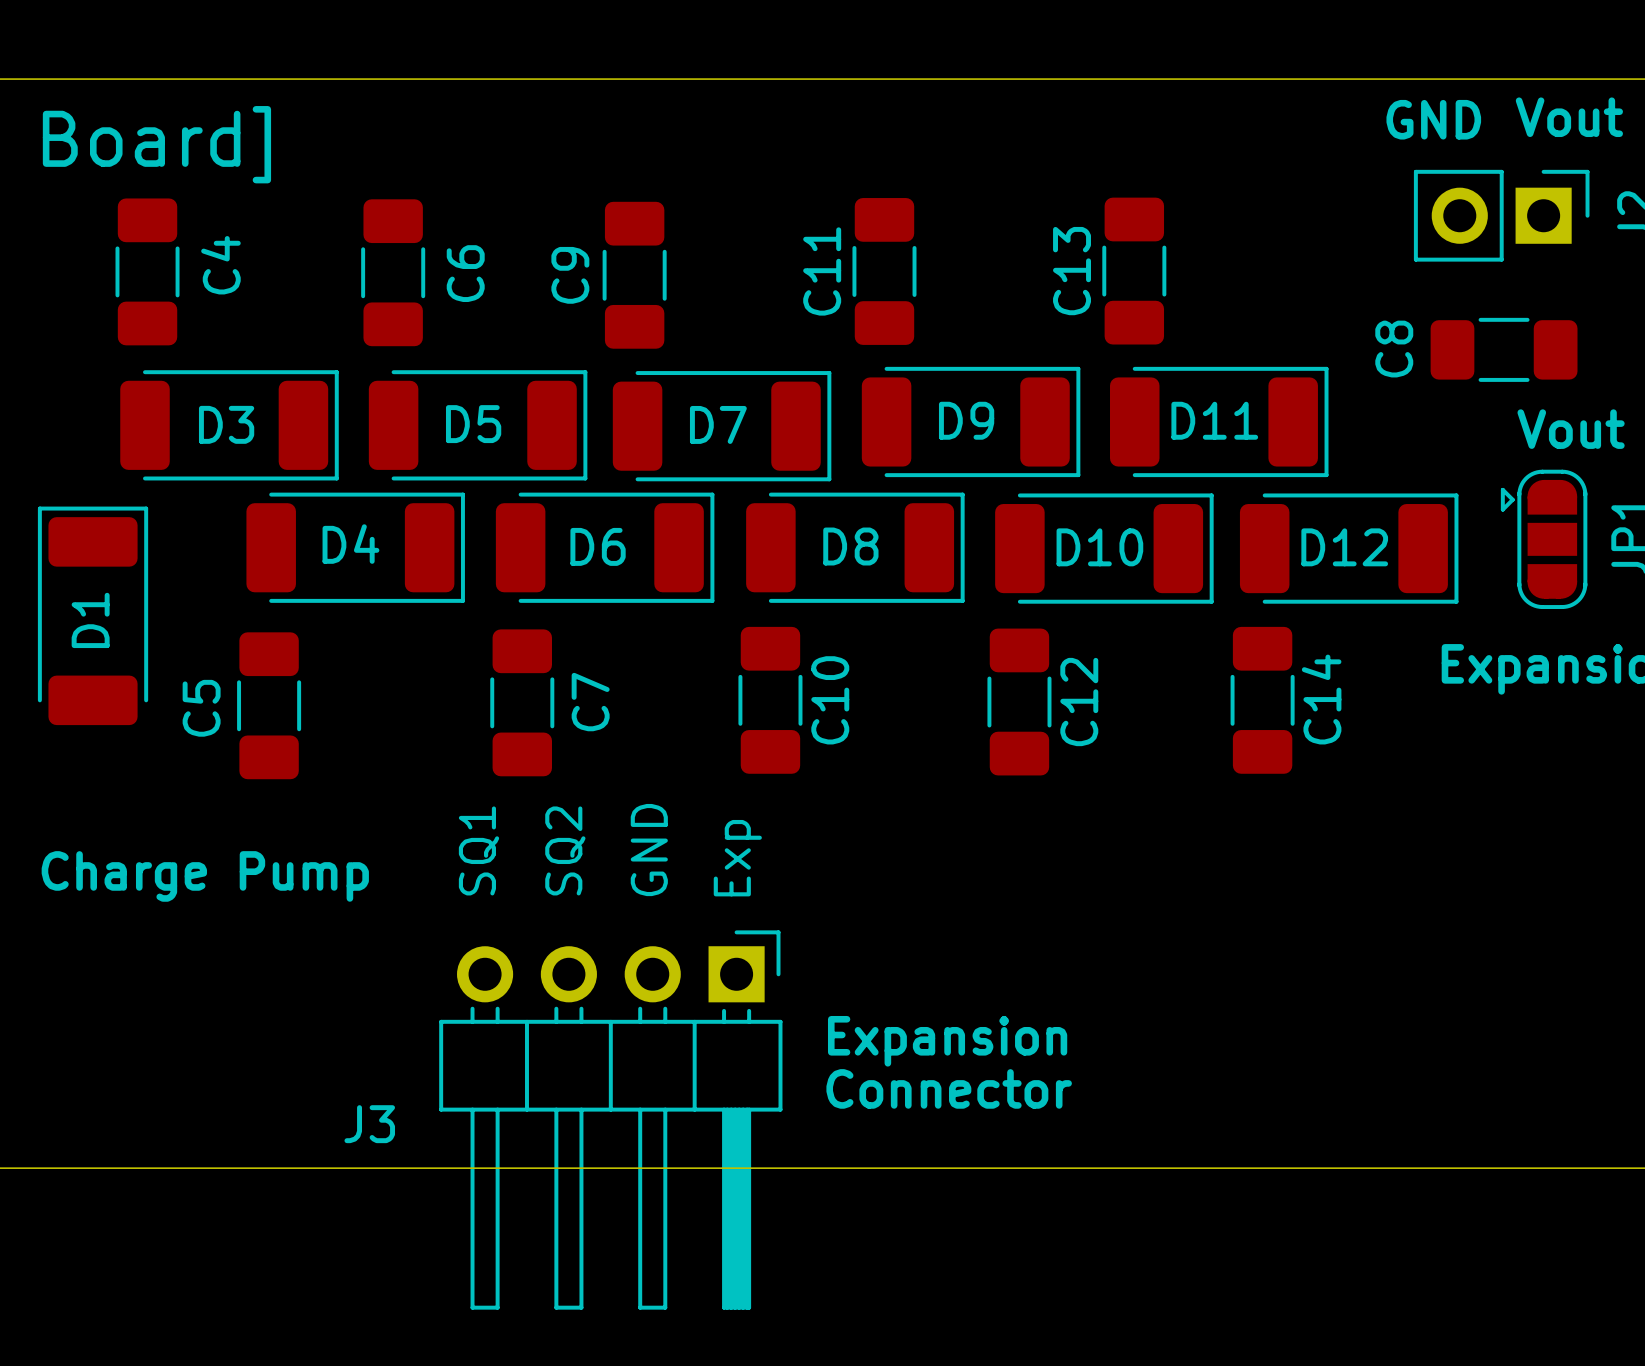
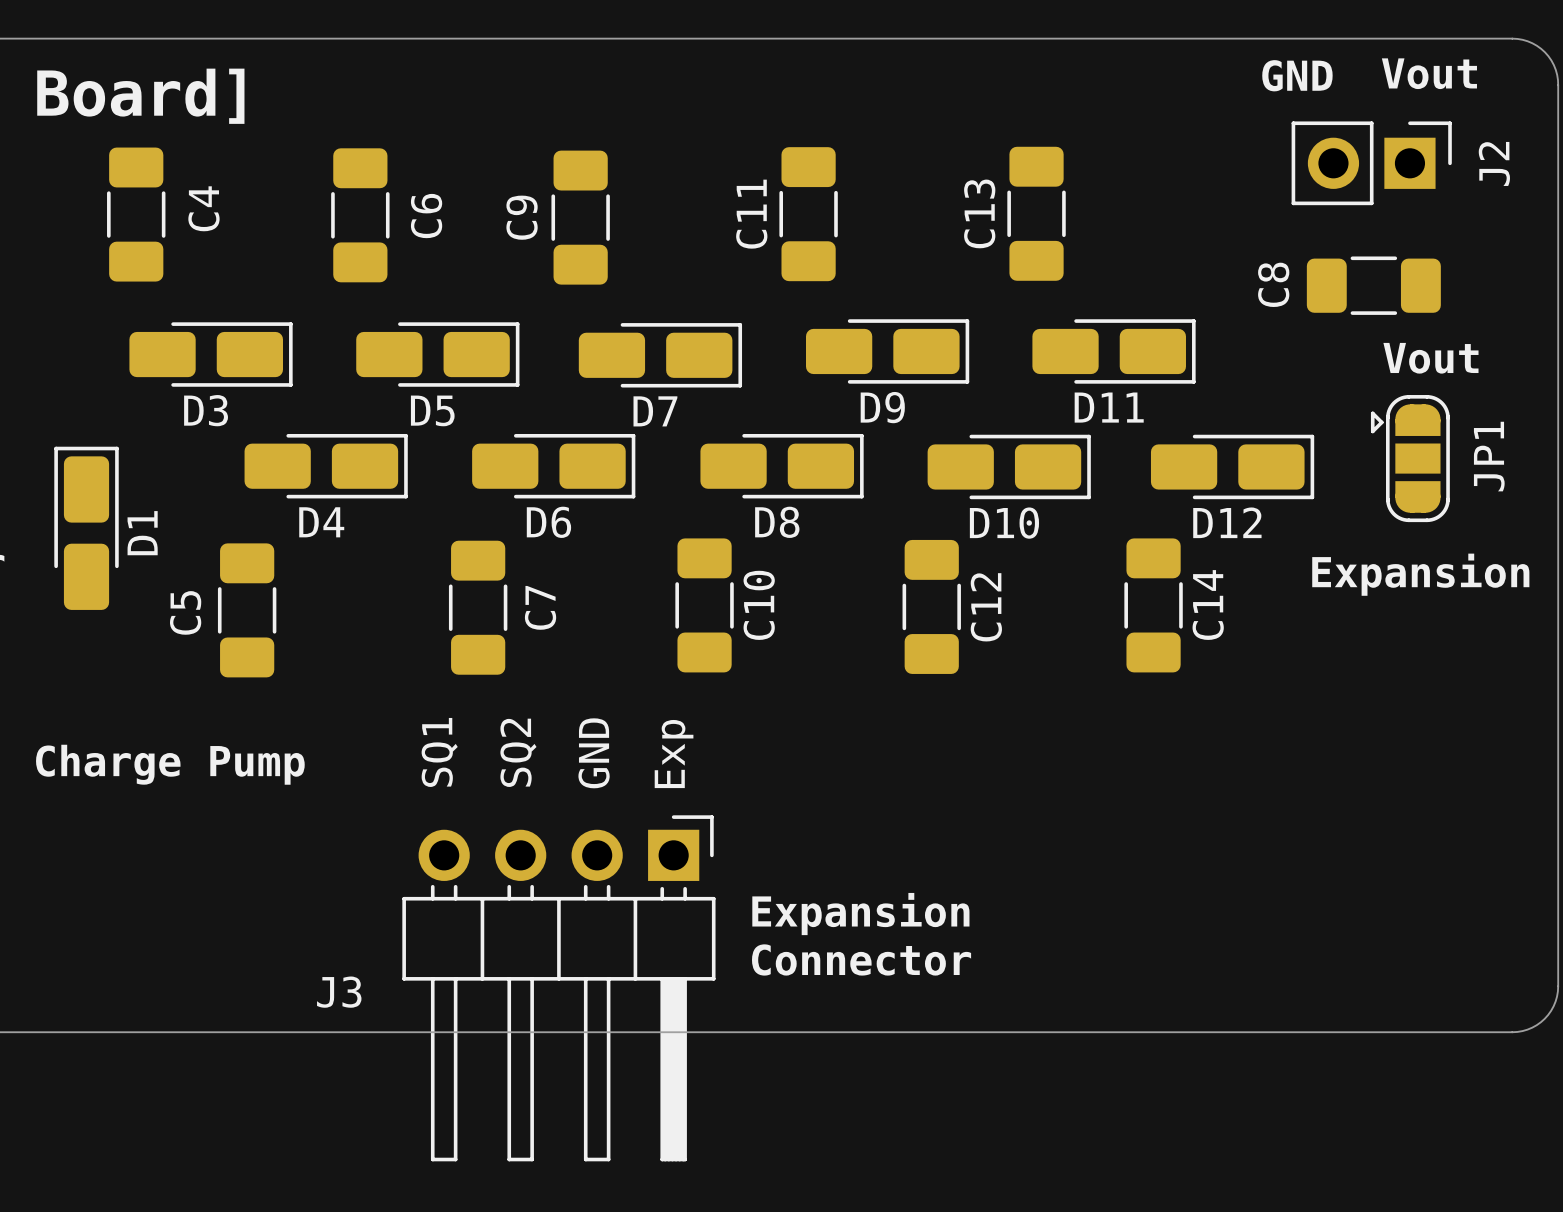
D9 footprint: [861, 366, 1081, 478] -> [805, 319, 970, 384]
D11 footprint: [1109, 366, 1329, 478] -> [1032, 319, 1196, 384]
D3 footprint: [120, 370, 339, 481] -> [129, 322, 293, 387]
D5 footprint: [368, 370, 588, 481] -> [356, 322, 520, 387]
D7 footprint: [612, 371, 832, 482] -> [578, 323, 743, 388]
D4 footprint: [246, 492, 465, 603] -> [244, 433, 408, 499]
D6 footprint: [495, 492, 715, 603] -> [472, 433, 636, 499]
D8 footprint: [746, 492, 965, 603] -> [700, 433, 864, 499]
D10 footprint: [995, 493, 1214, 604] -> [927, 434, 1091, 500]
D12 footprint: [1239, 493, 1459, 604] -> [1150, 434, 1315, 500]
D1 footprint: [37, 506, 149, 726] -> [54, 446, 119, 610]

